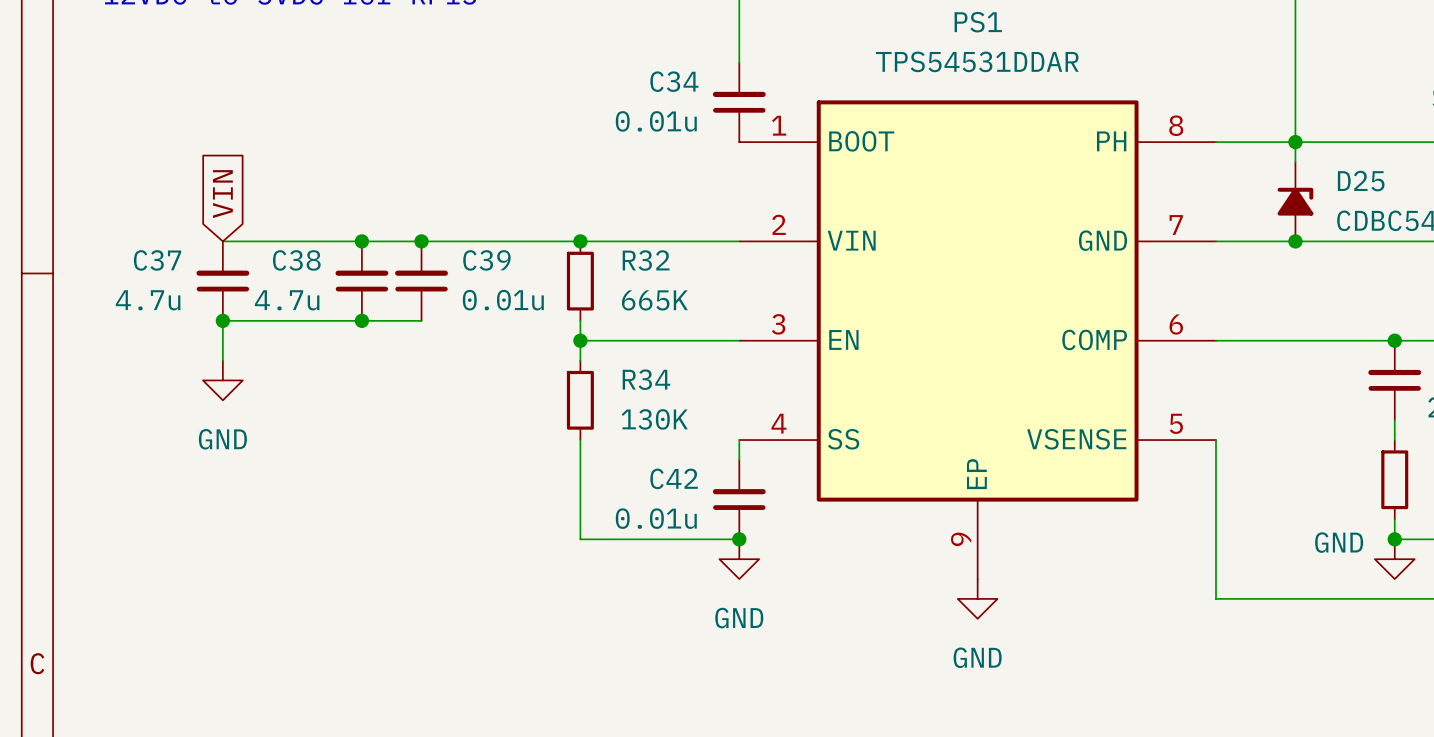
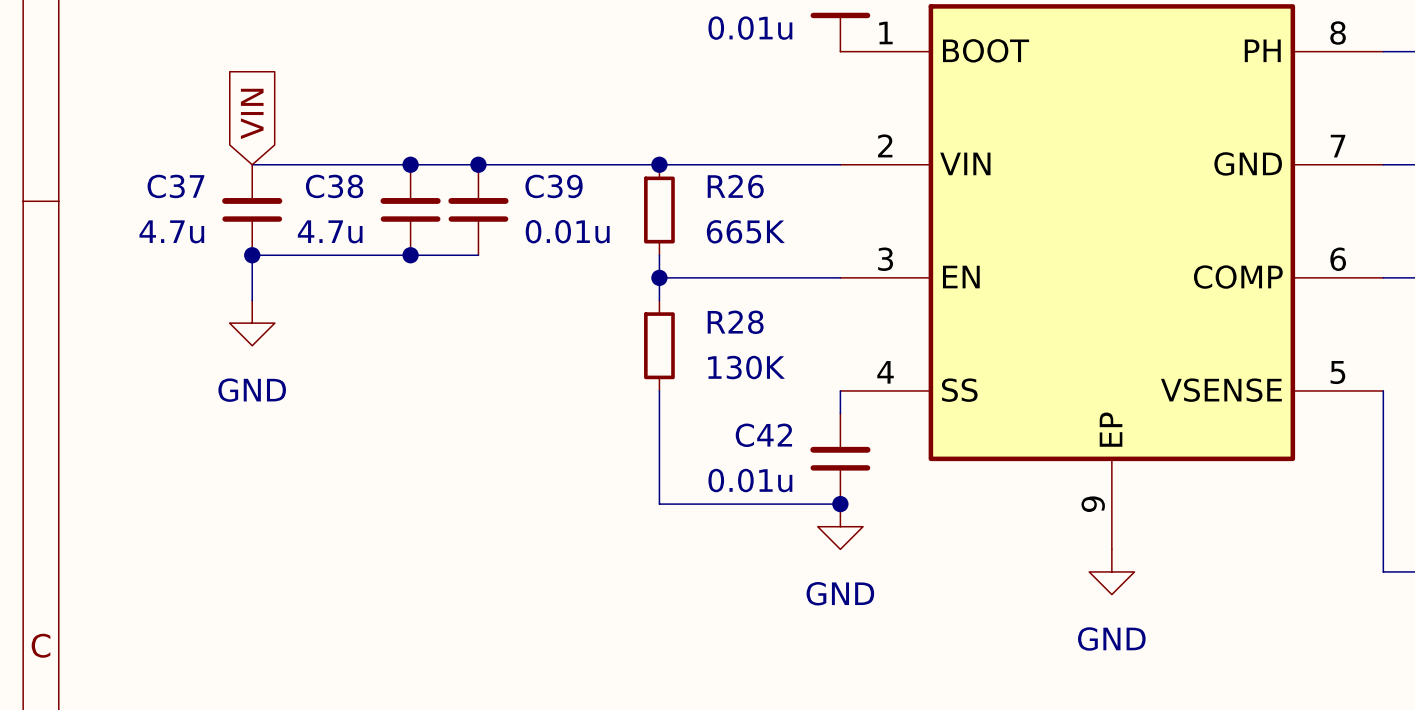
R32 name: R32 (646, 260) -> R26 (735, 186)
R34 name: R34 (646, 379) -> R28 (735, 322)

